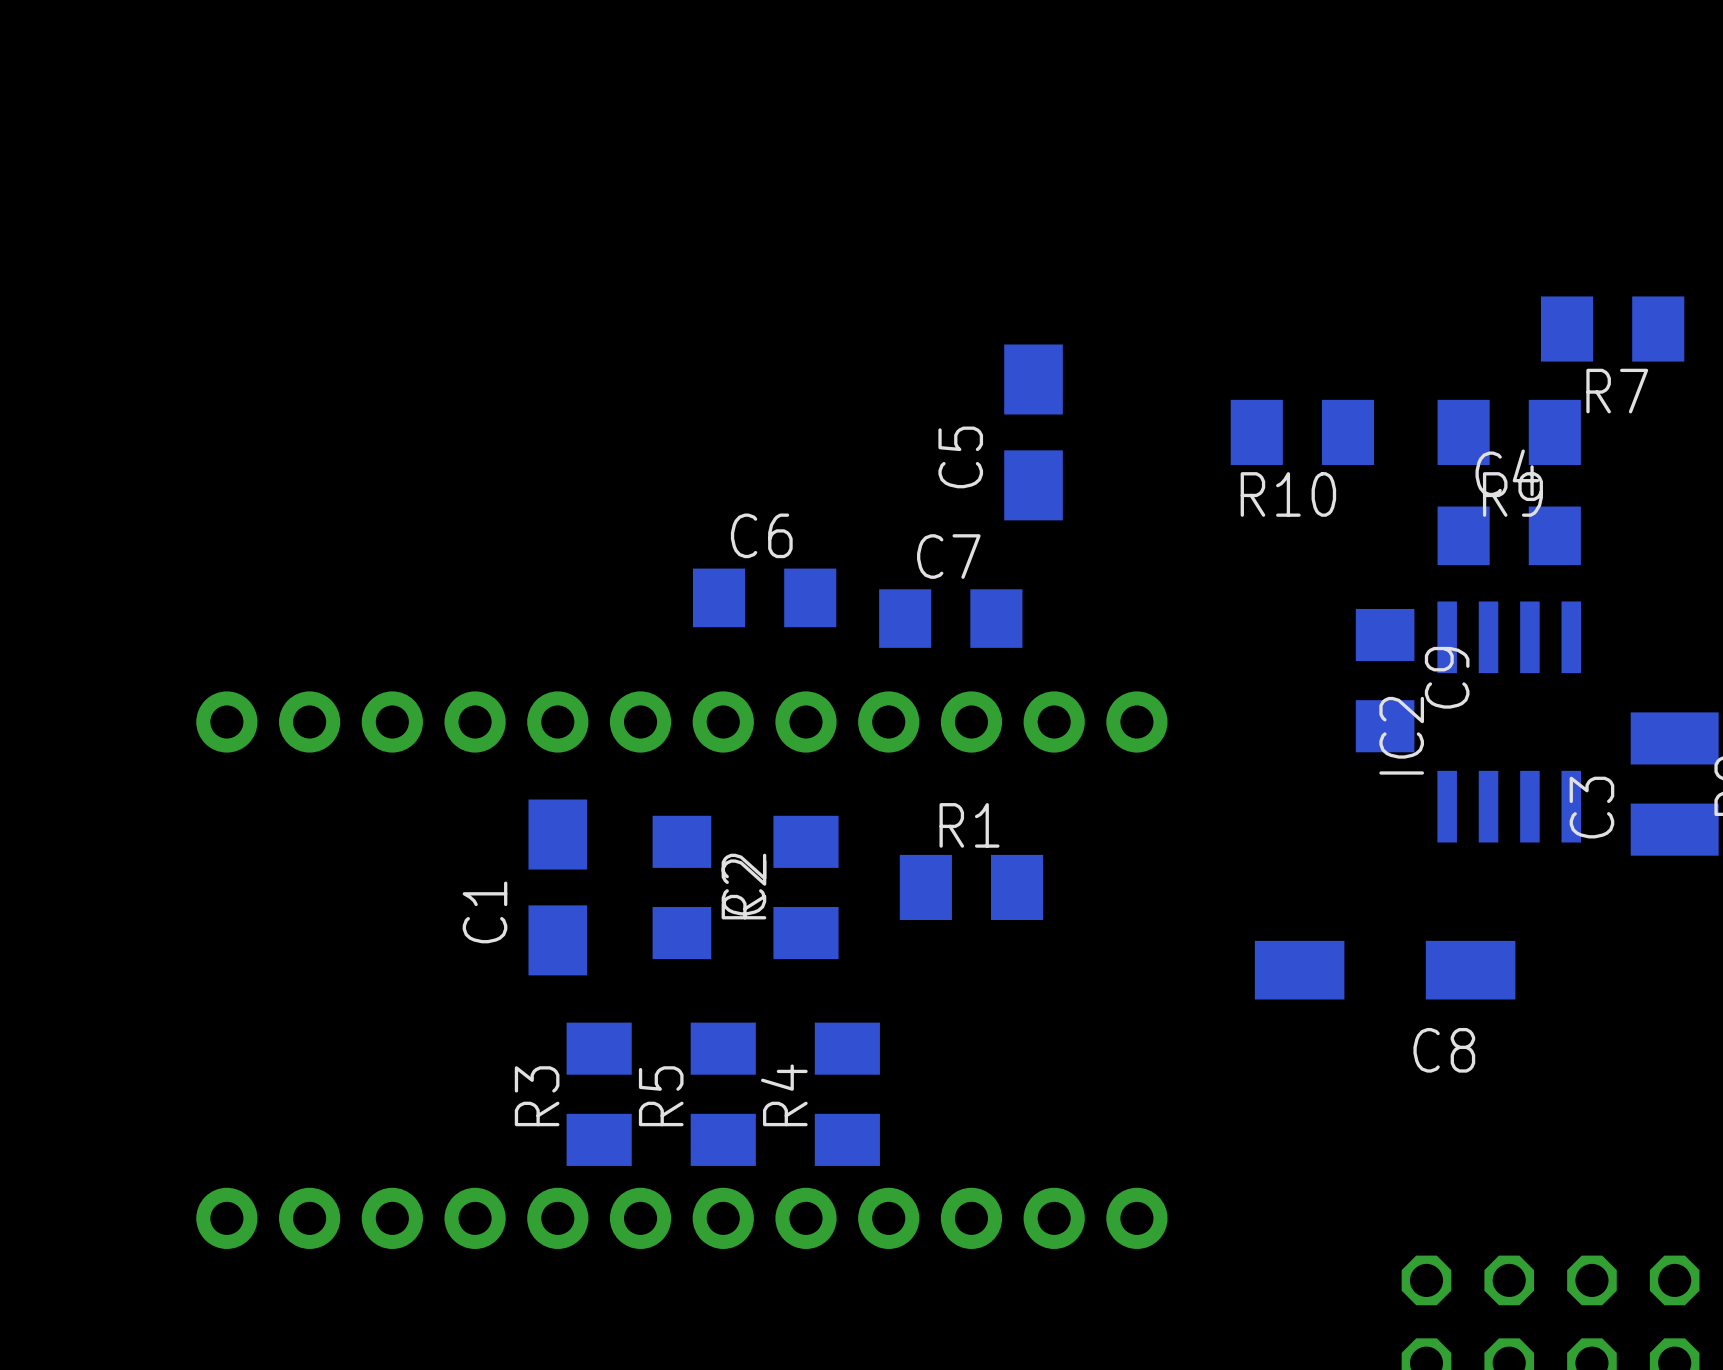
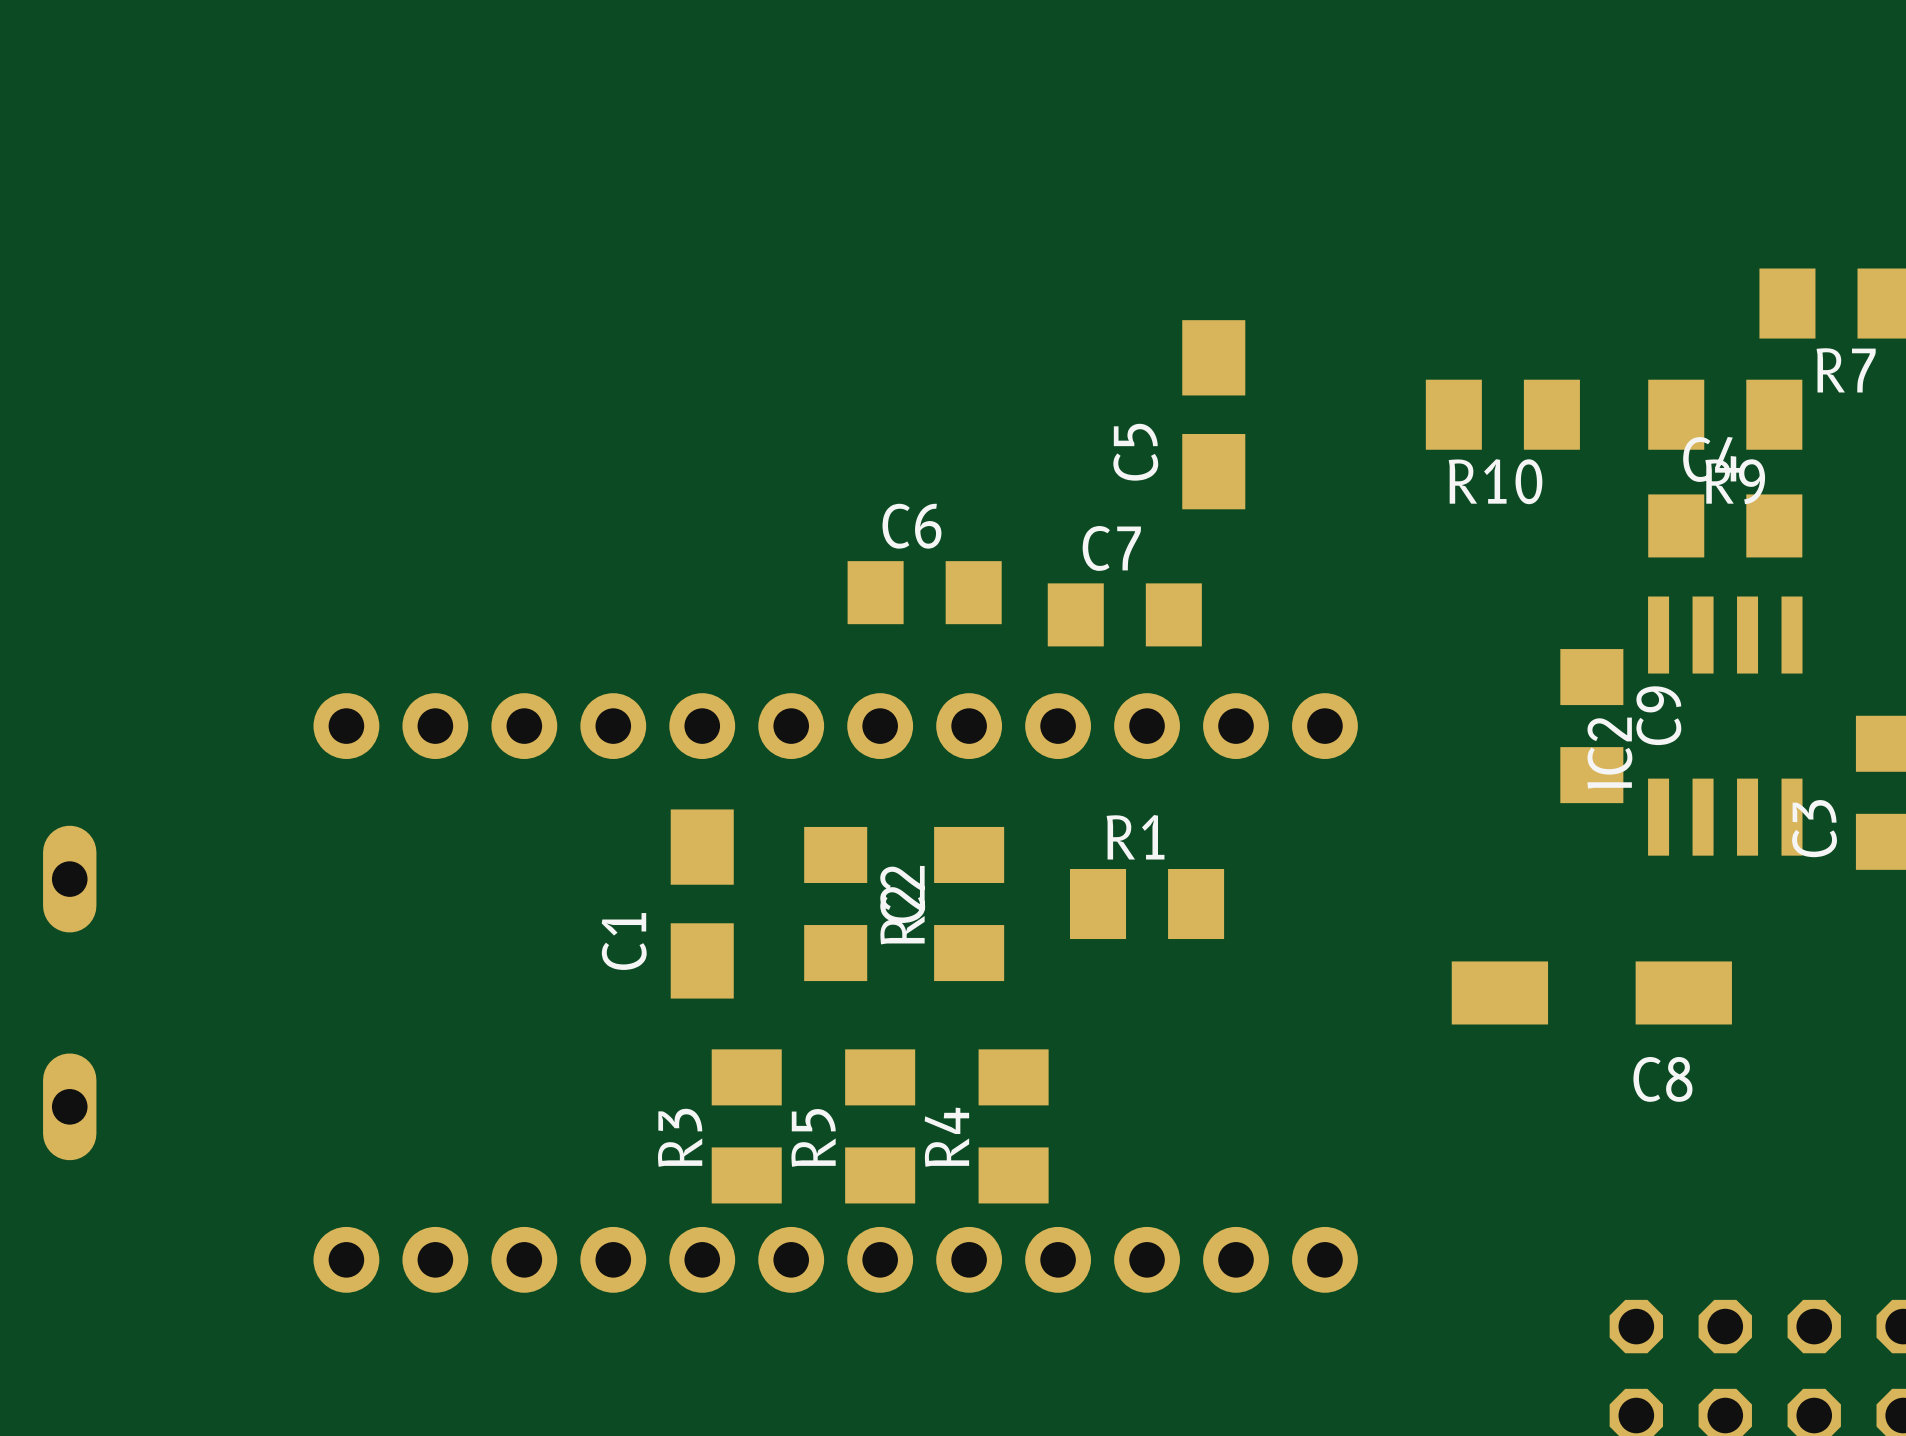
C9 position: (1385, 680) -> (1591, 726)

